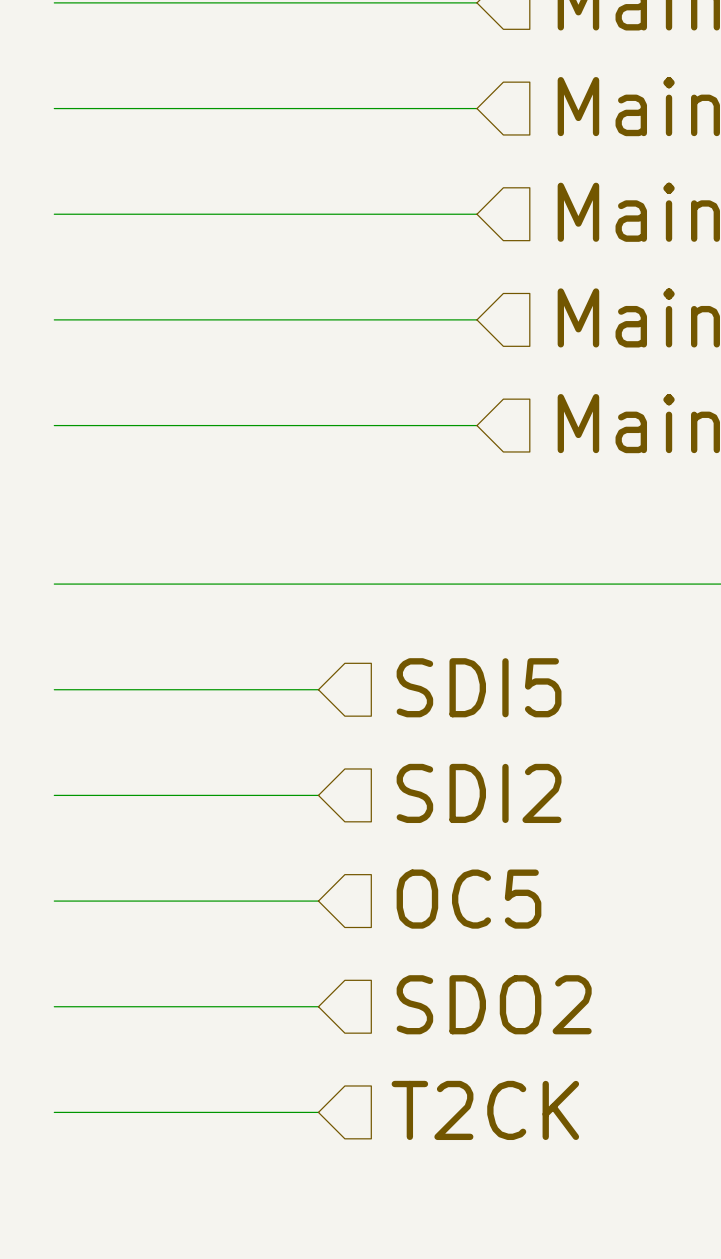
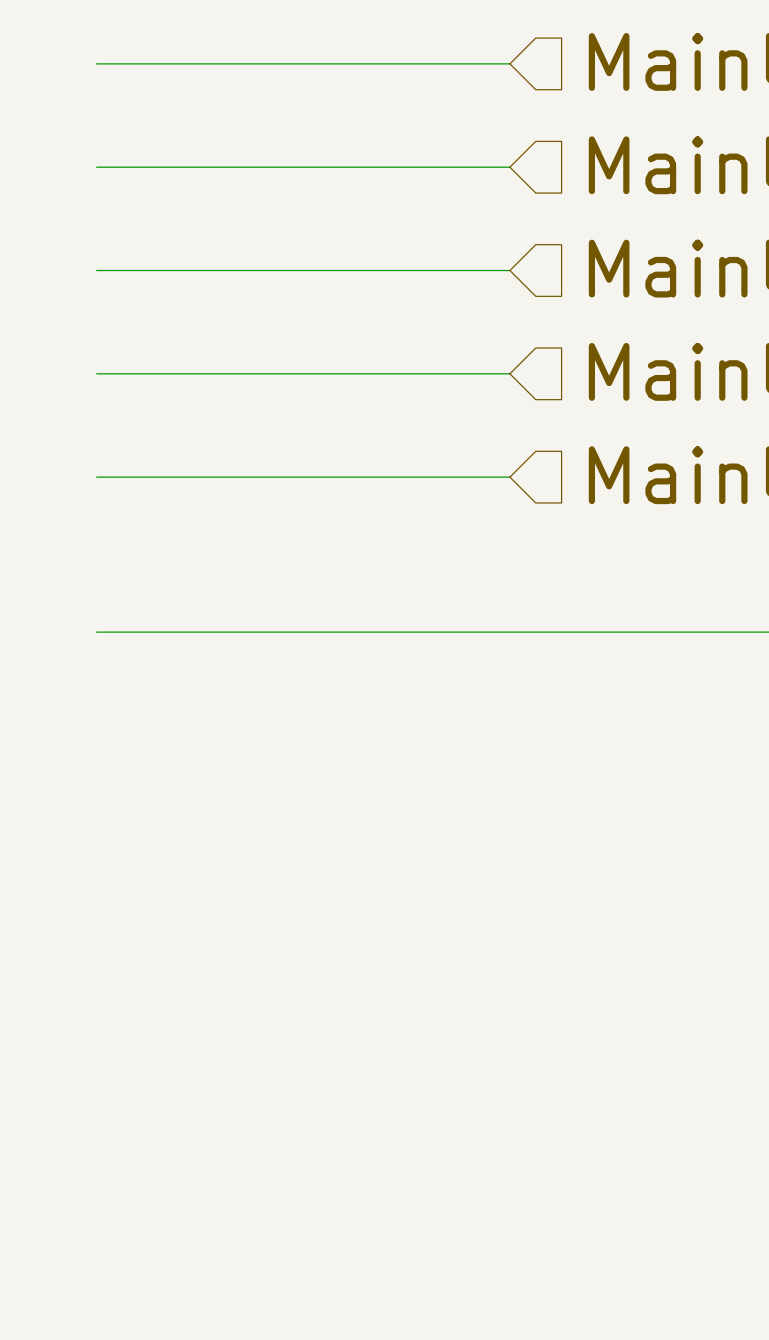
hierarchical label: SDI5 (479, 687) -> none
wire: (54, 689) (318, 689) -> none
hierarchical label: SDI2 (479, 793) -> none
wire: (54, 795) (318, 795) -> none
hierarchical label: OC5 (468, 899) -> none
wire: (54, 901) (318, 901) -> none
hierarchical label: SDO2 (494, 1004) -> none
wire: (54, 1006) (318, 1006) -> none
hierarchical label: T2CK (485, 1110) -> none
wire: (54, 1112) (318, 1112) -> none

